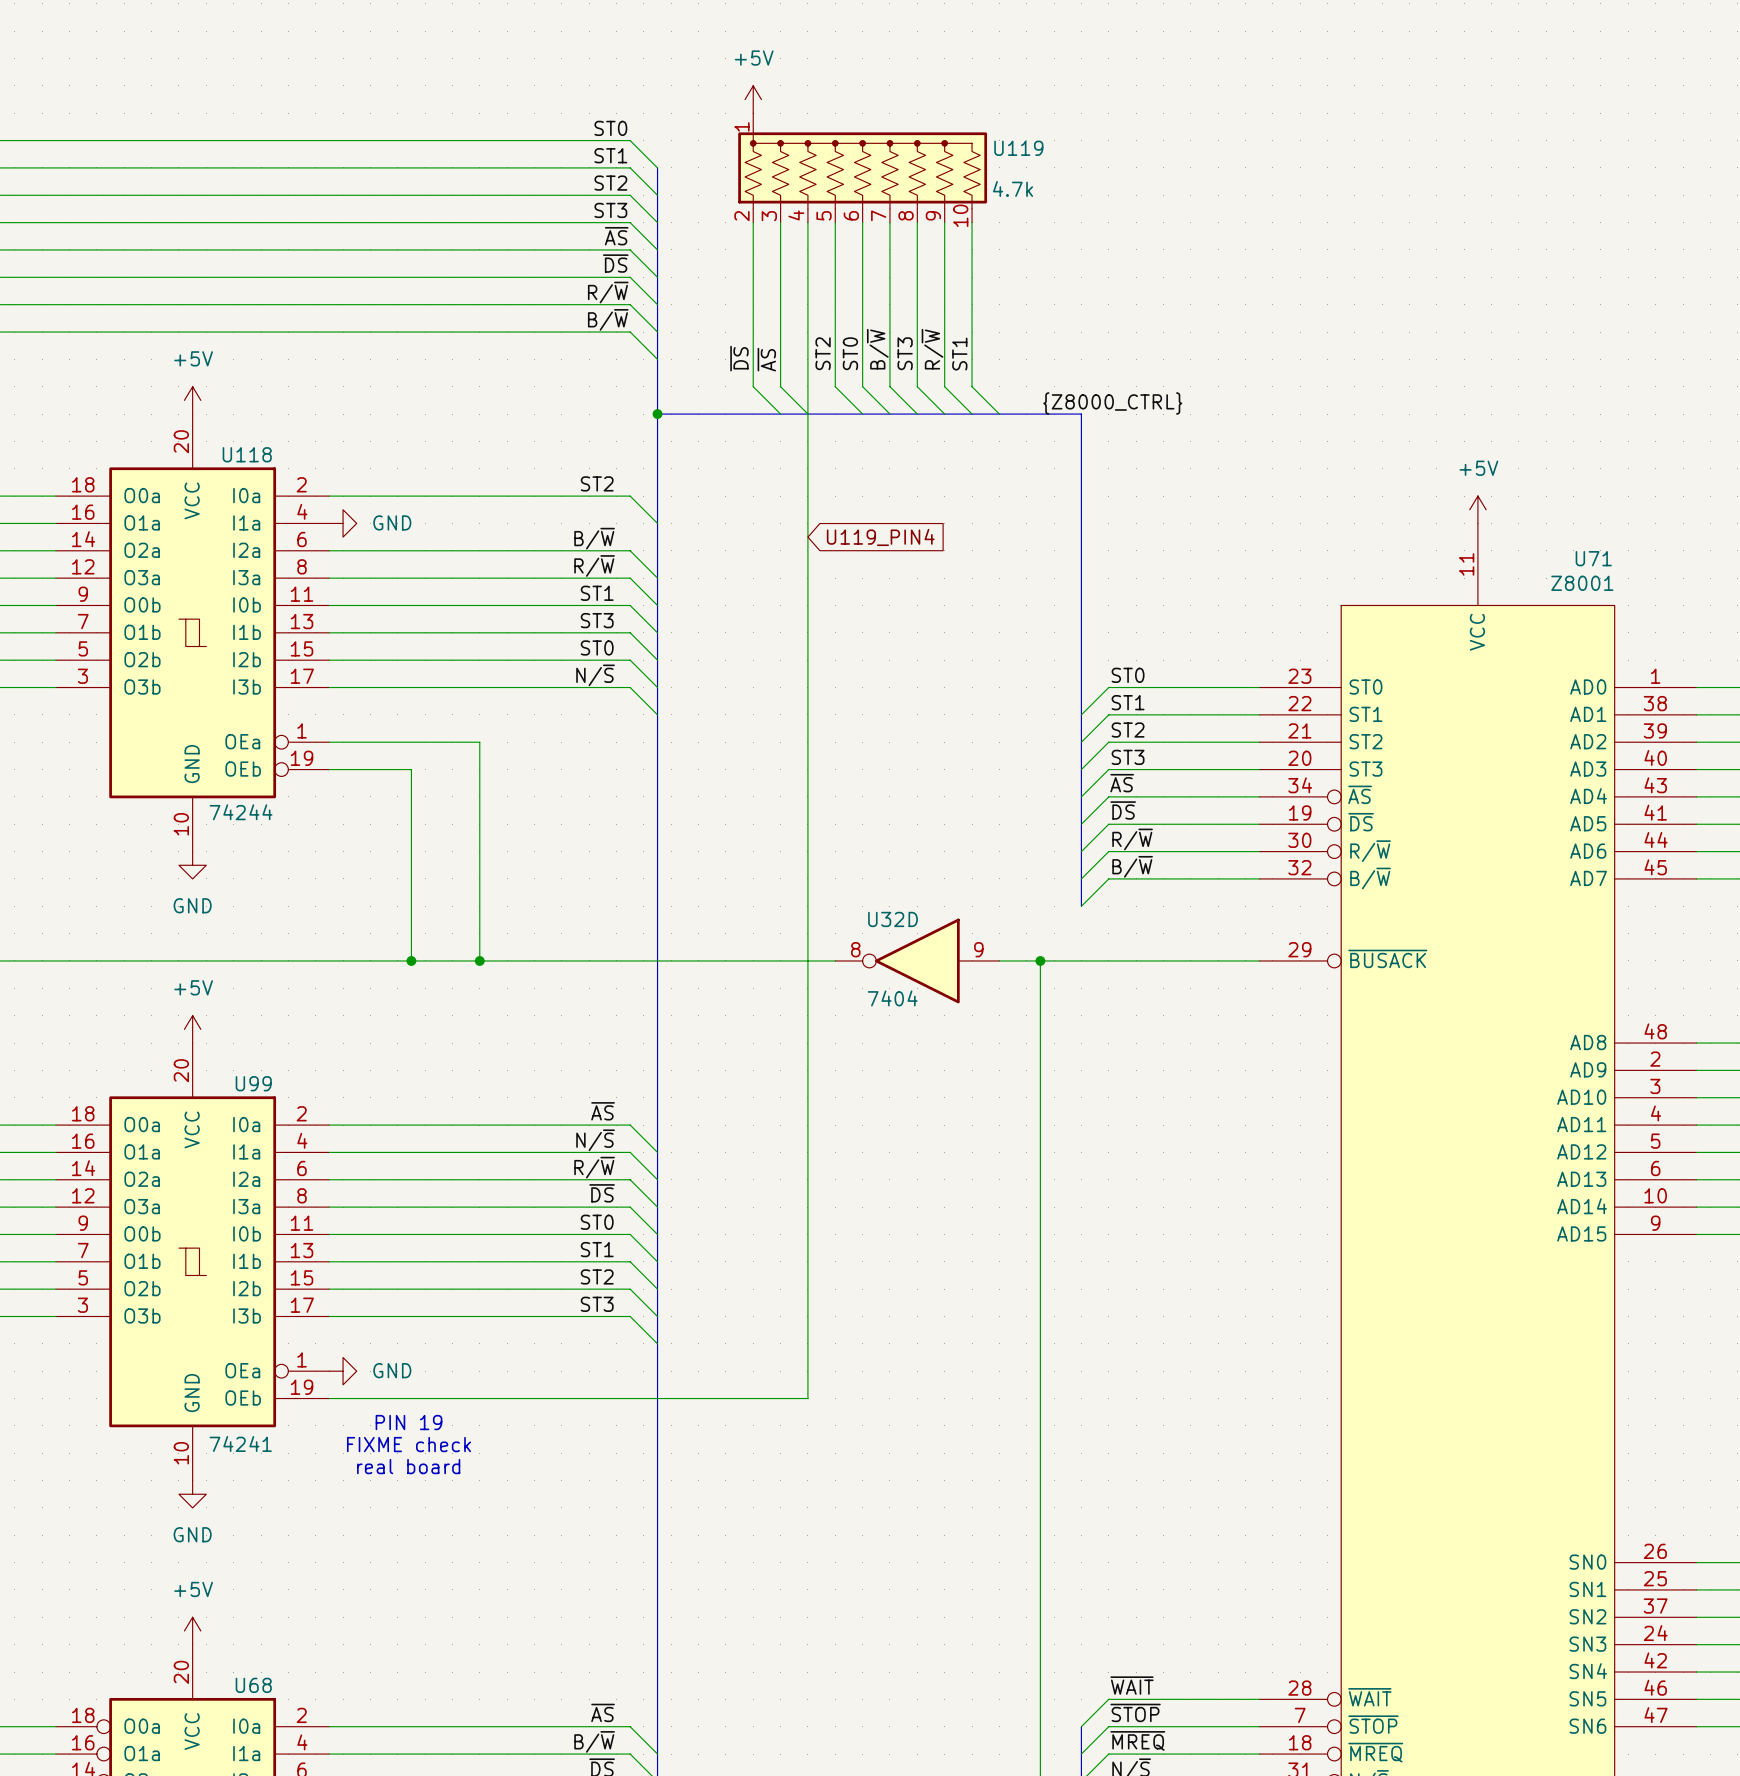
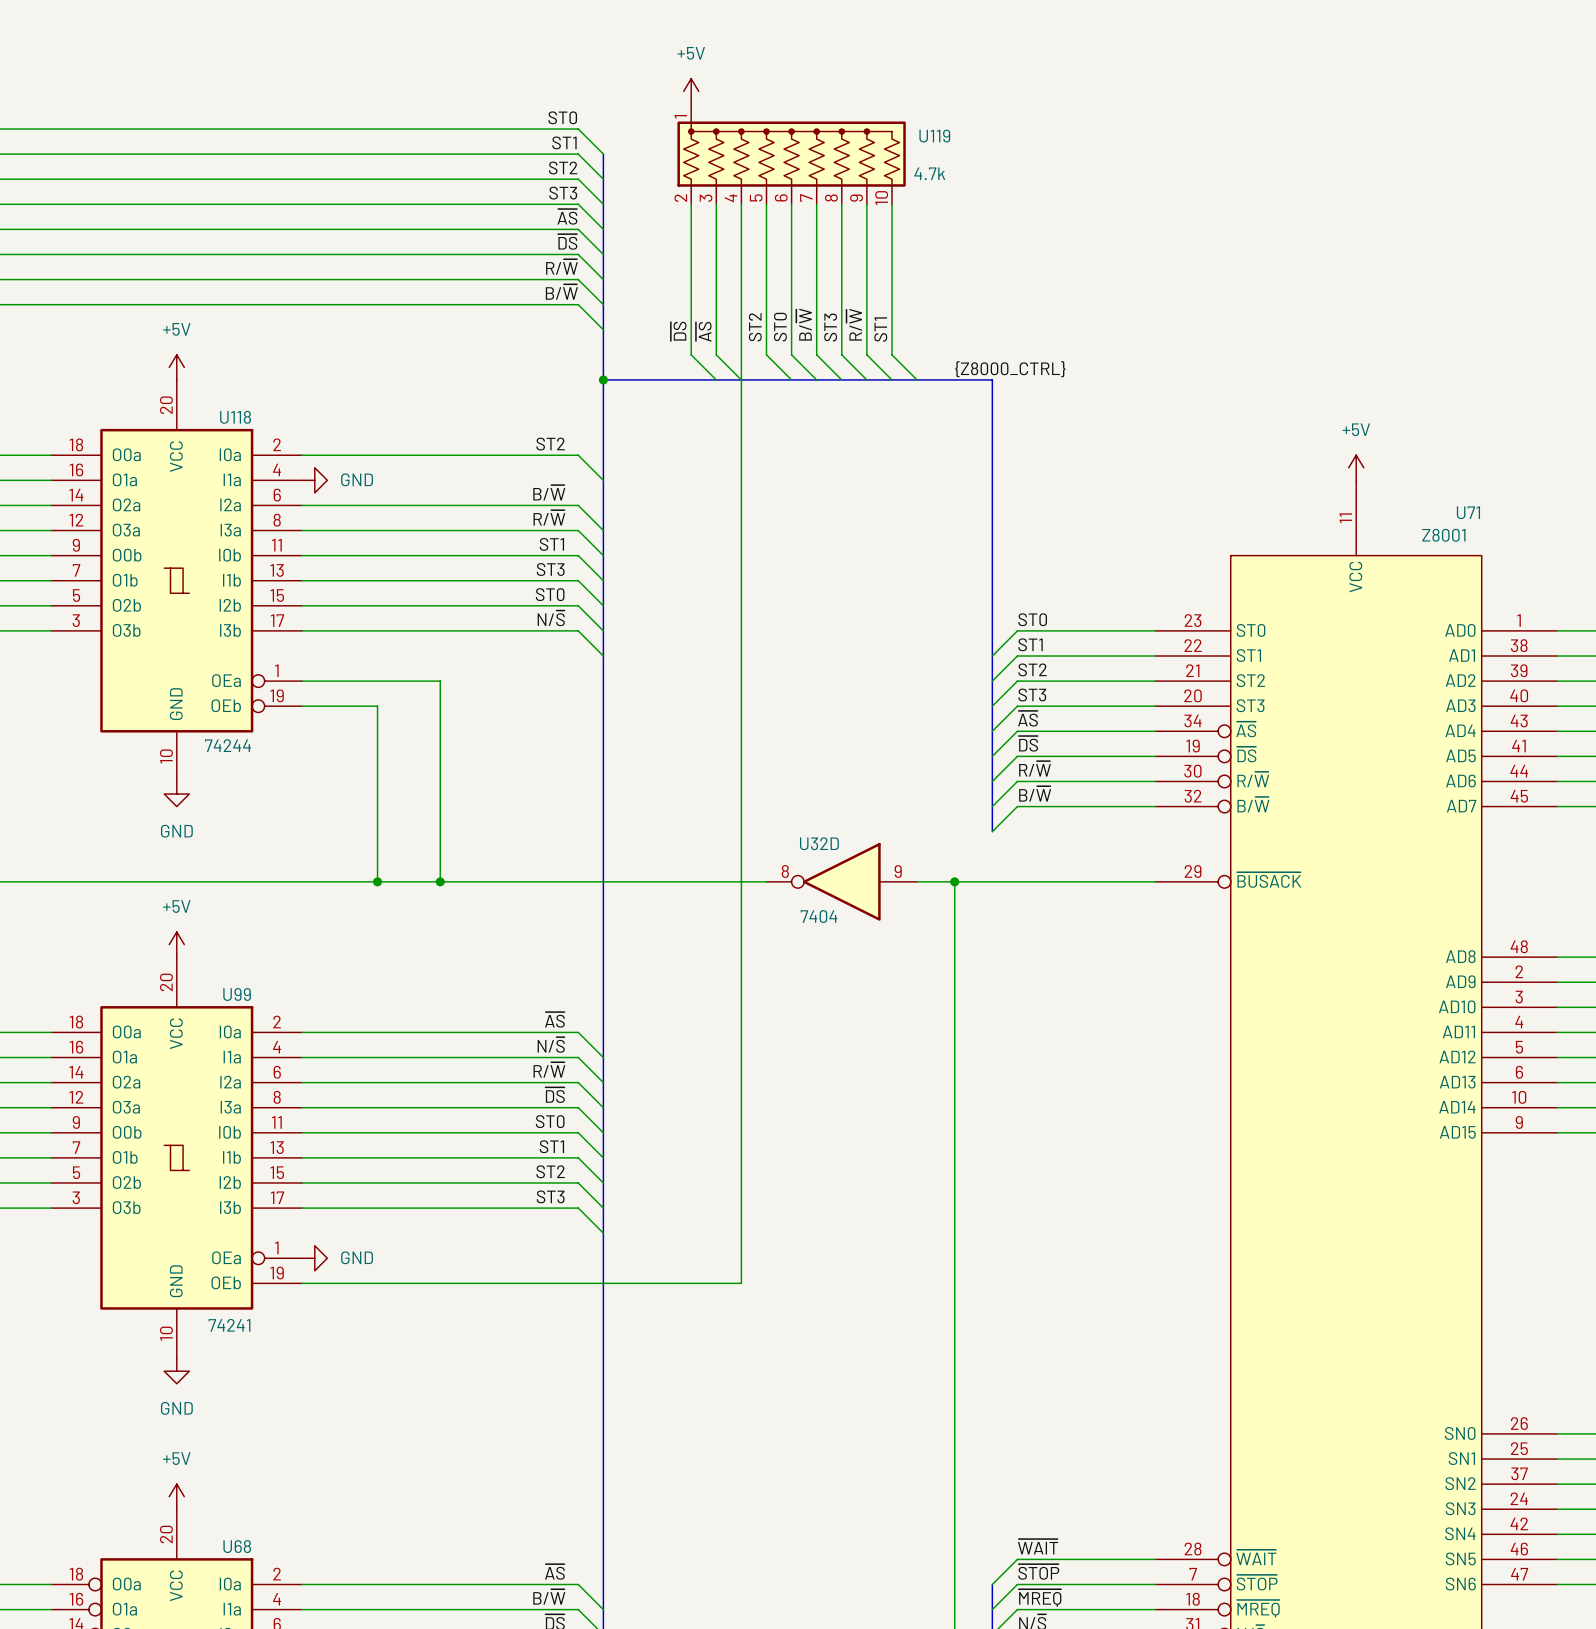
global label: U119_PIN4 (880, 537) -> none
text: PIN 19 (409, 1422) -> none
text: FIXME check (409, 1444) -> none
text: real board (408, 1466) -> none

